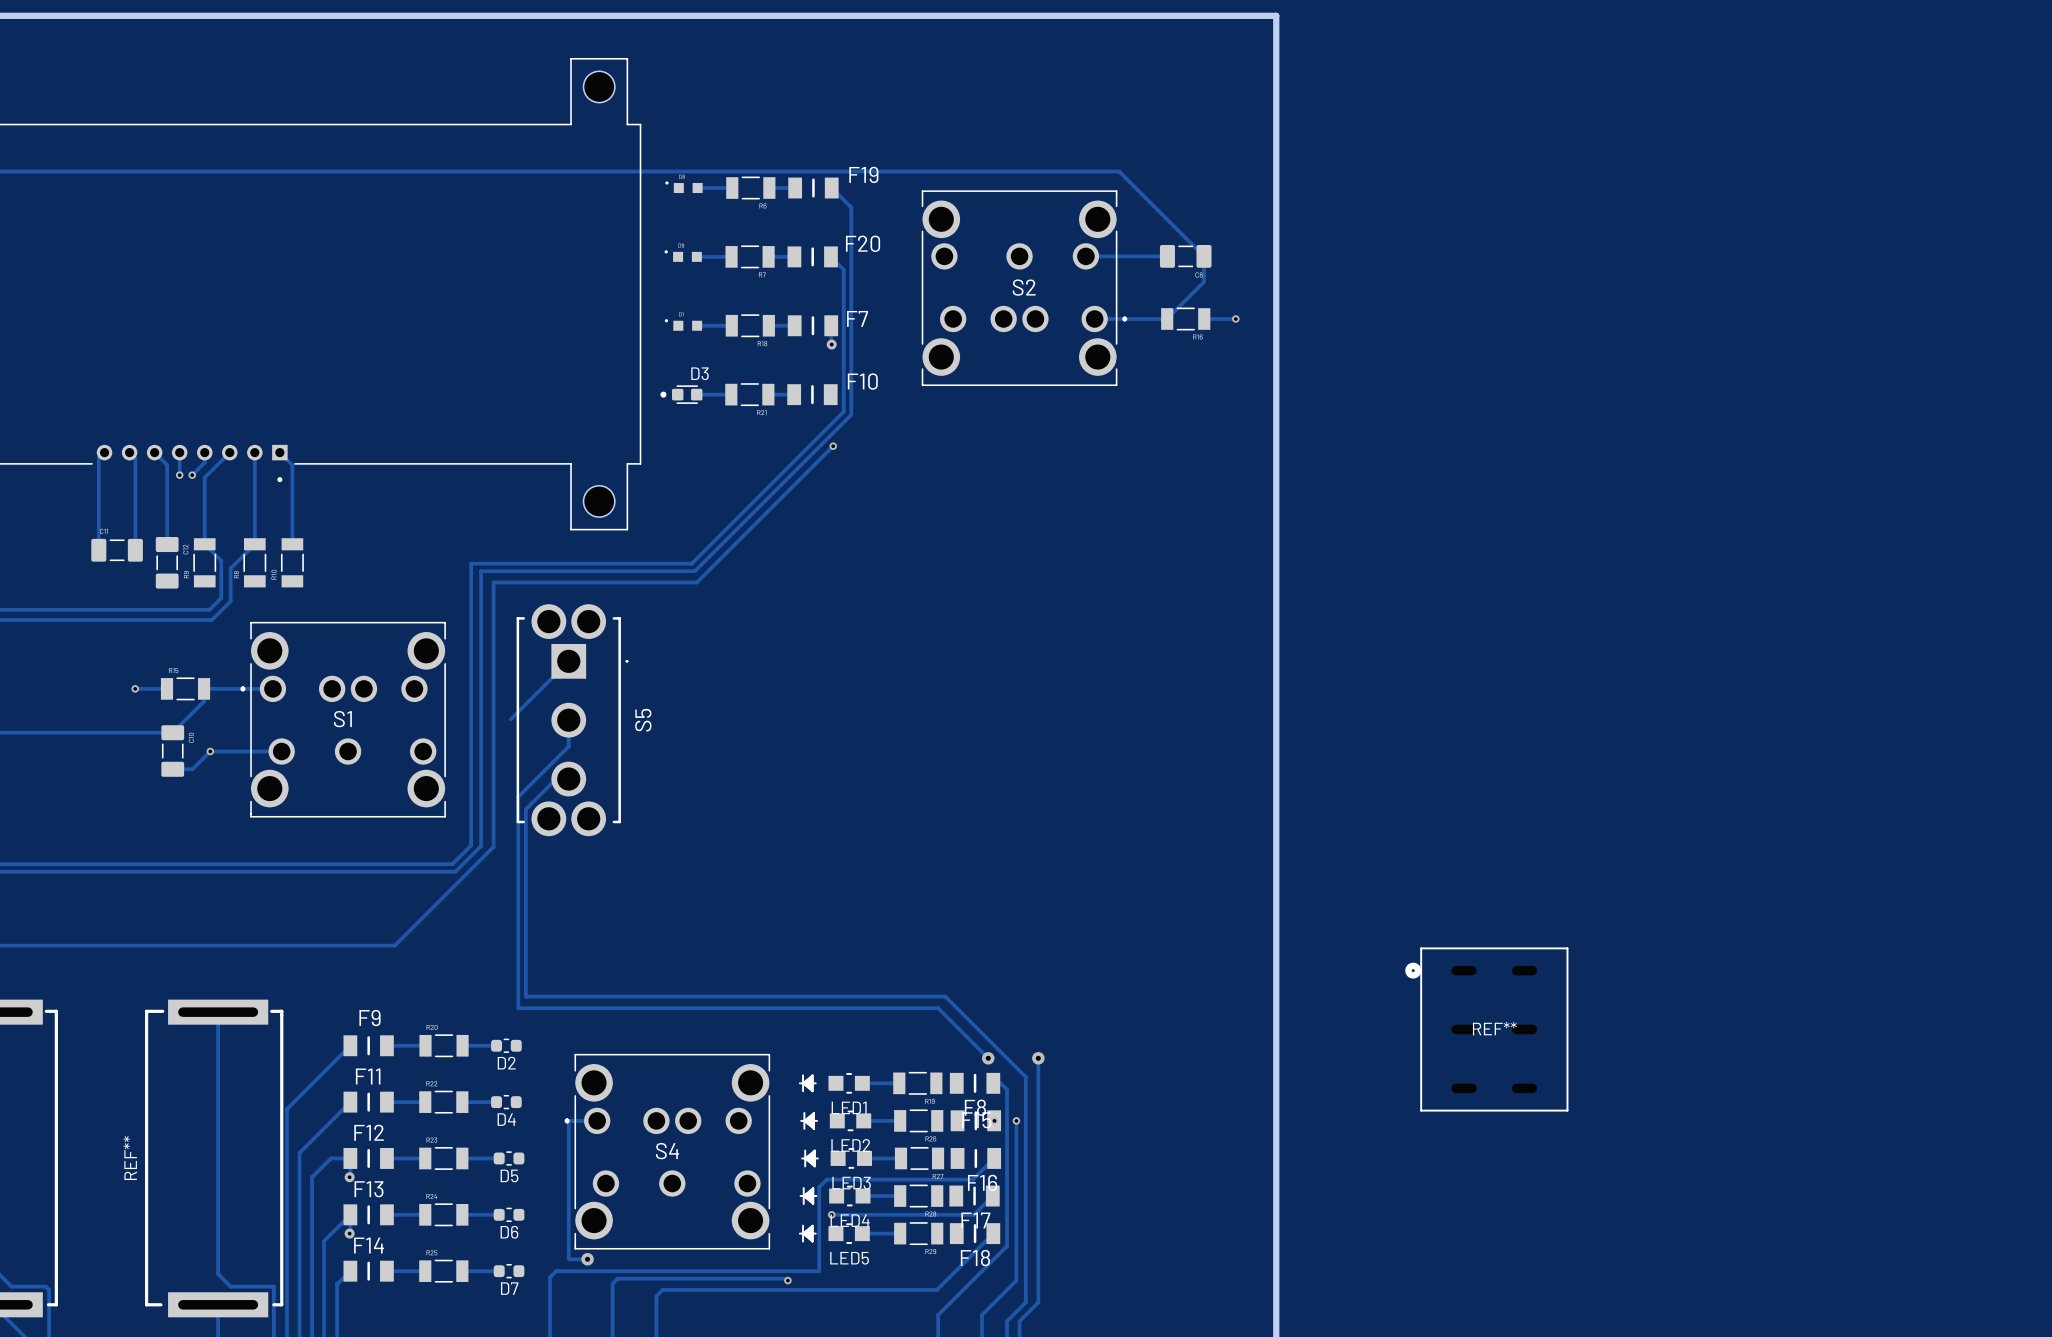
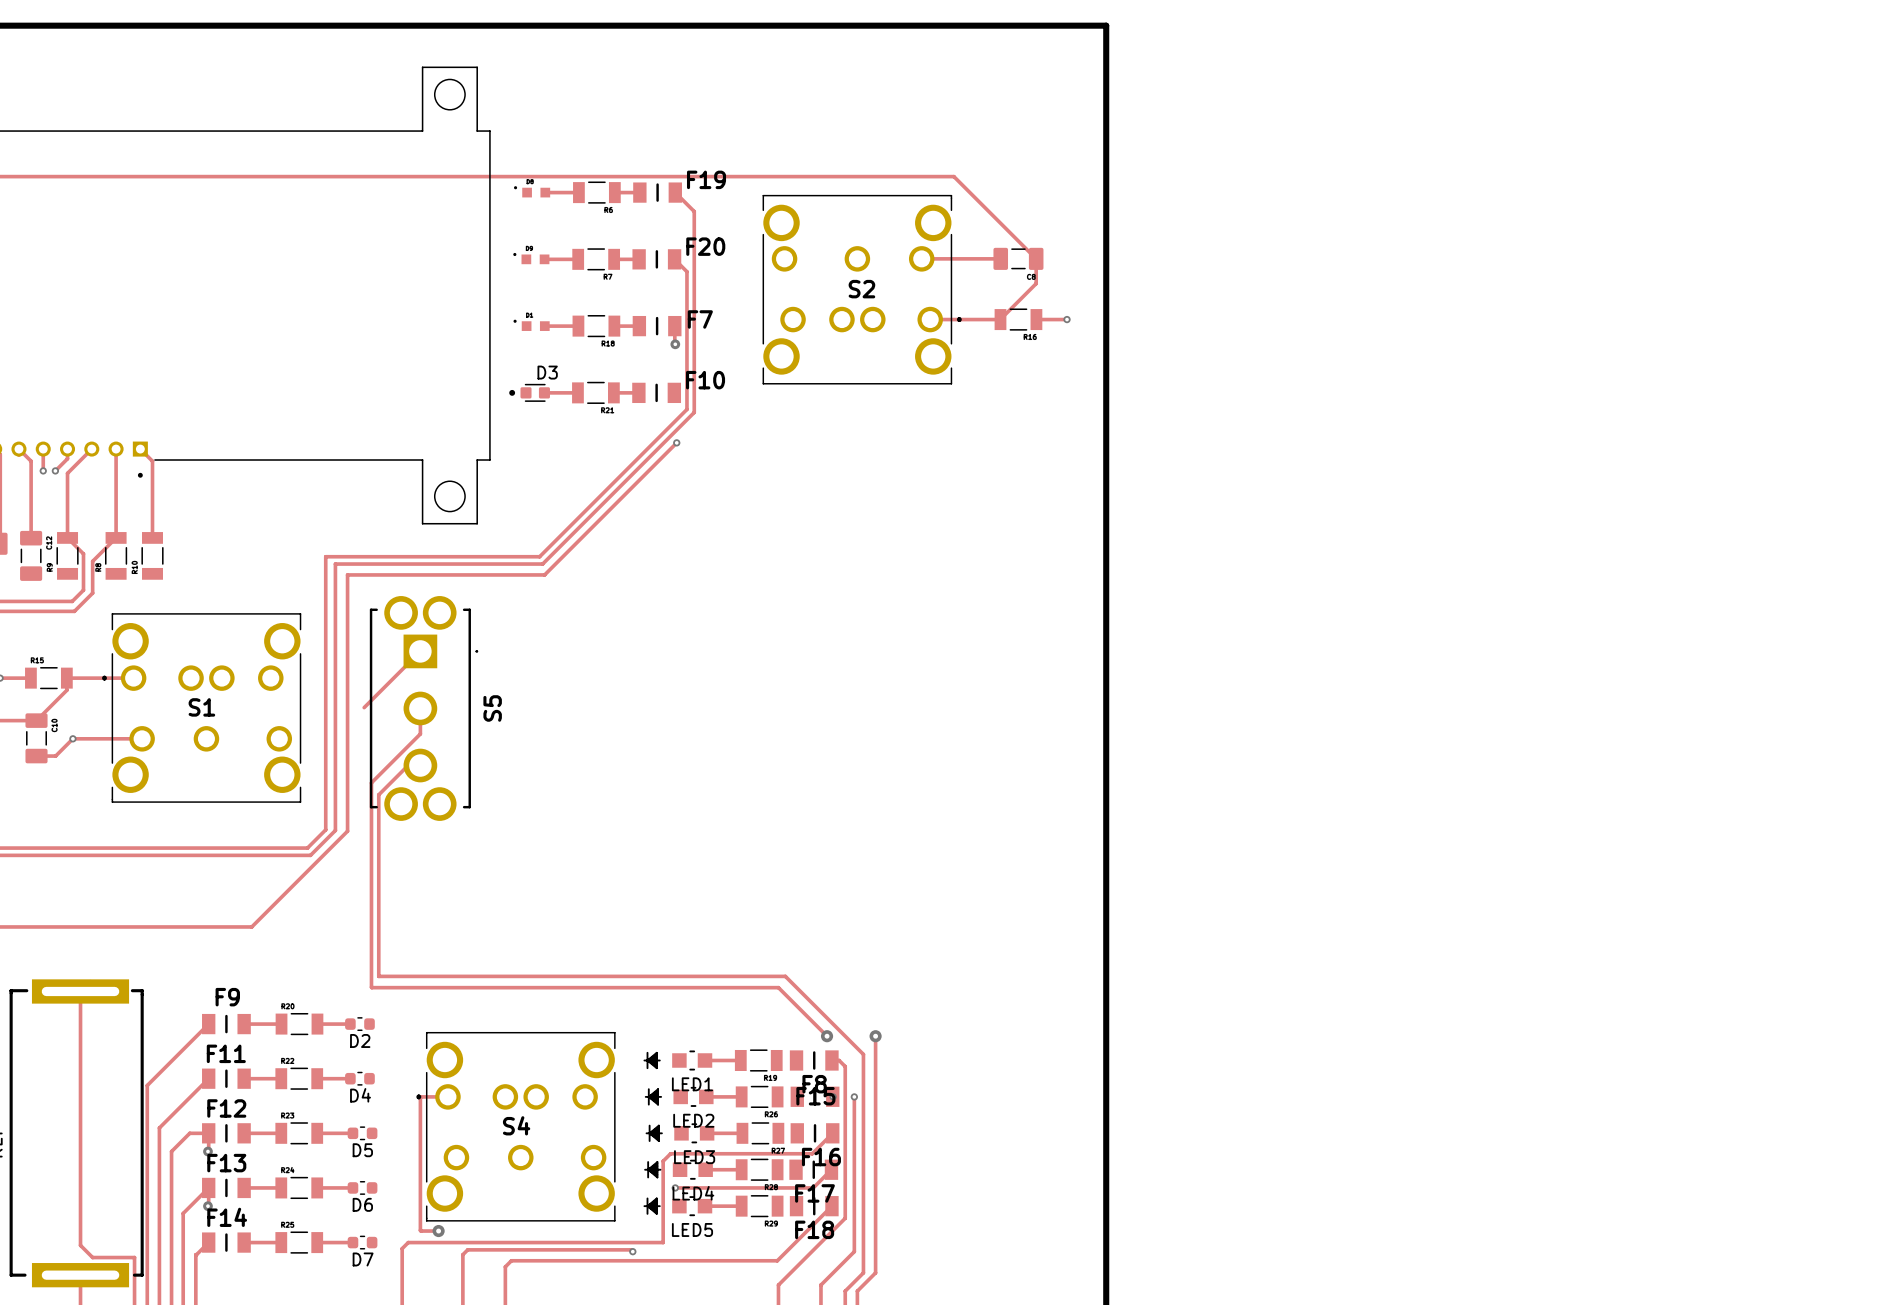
REF**: (1486, 1029) -> none

